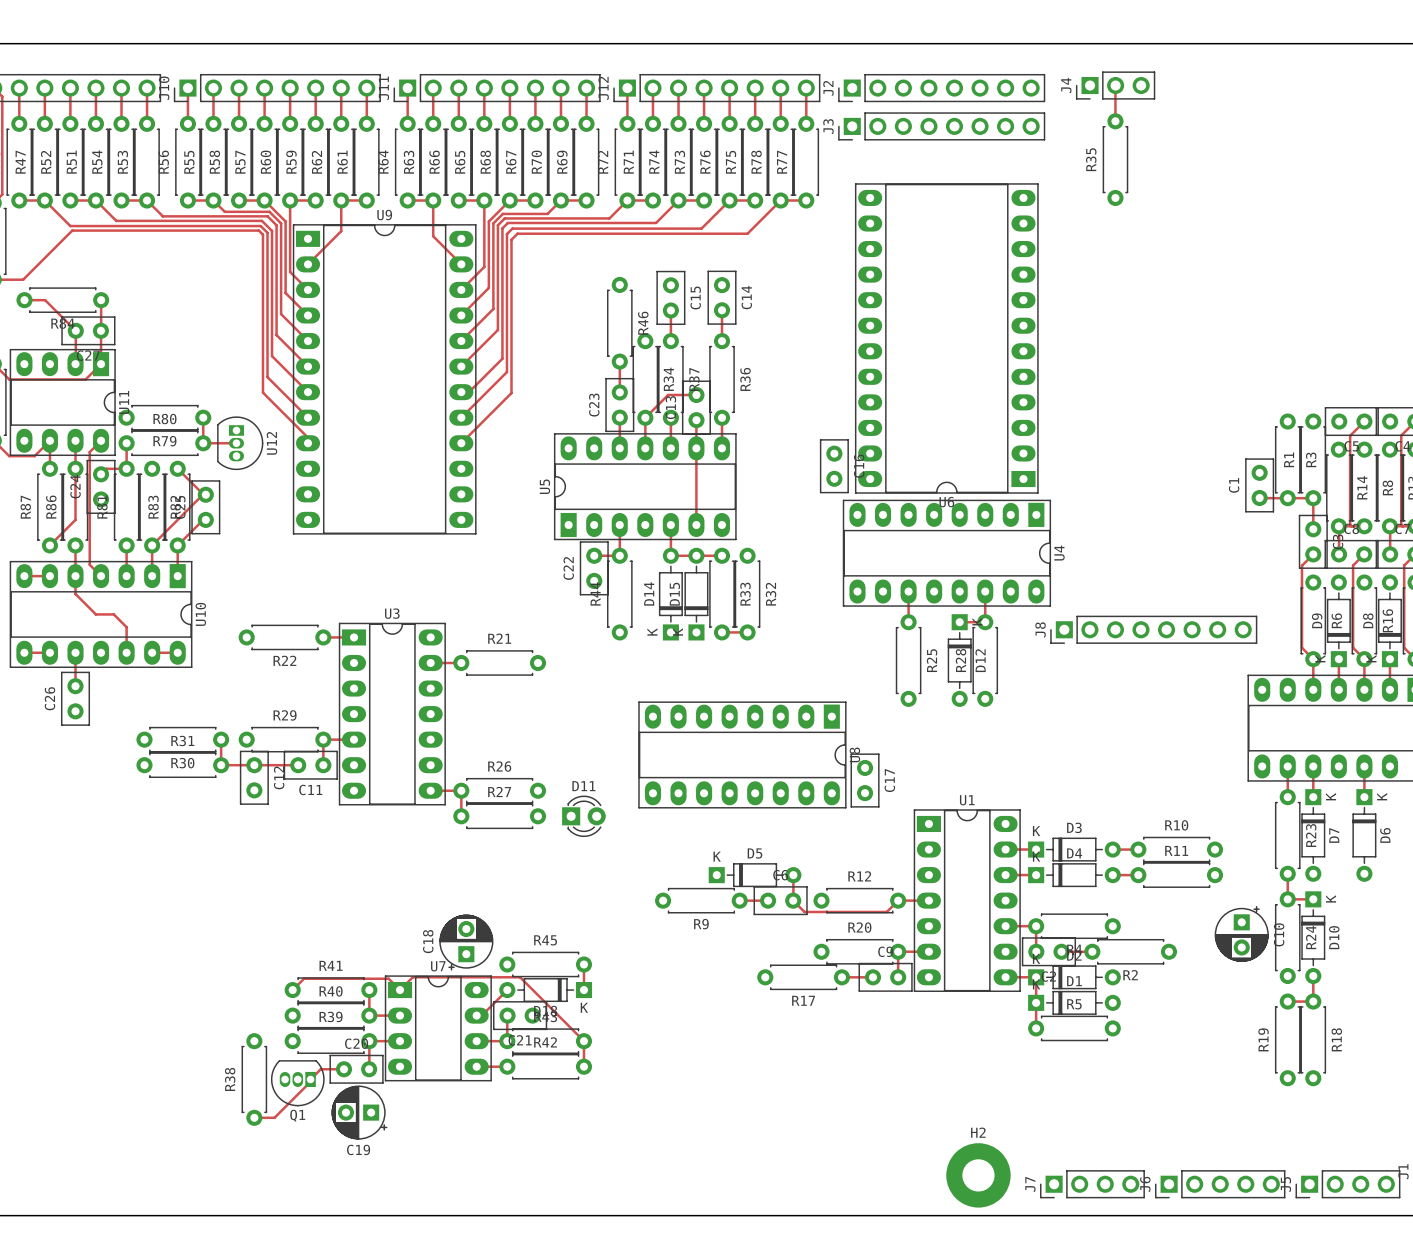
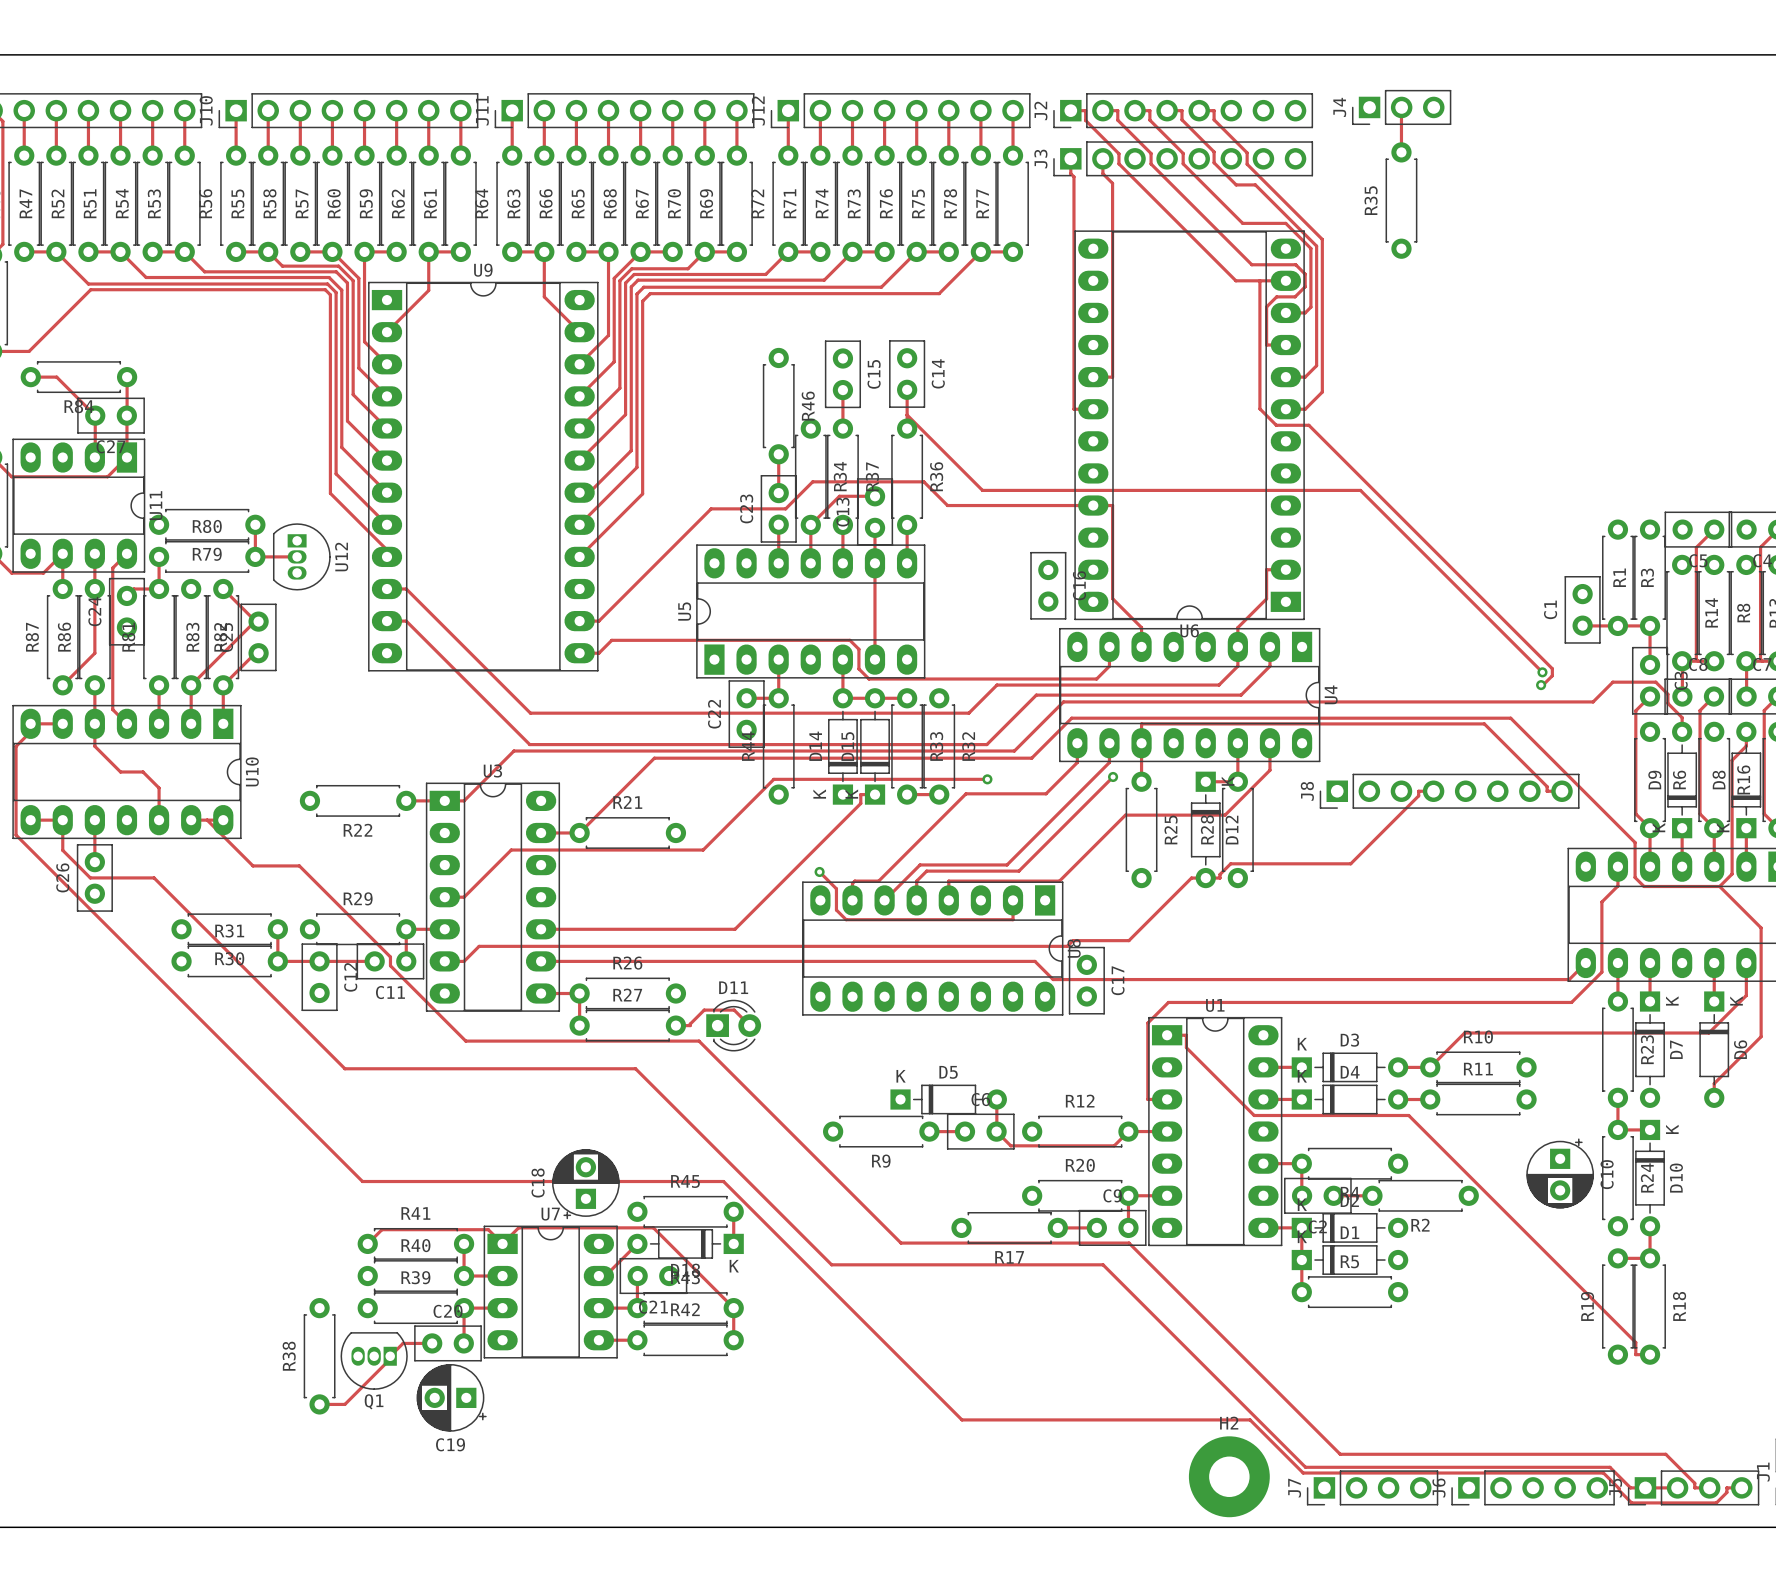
track: none -> (1070, 110) (1085, 110) (1085, 120) (1118, 153) (1118, 163) (1235, 280) (1285, 280)
track: none -> (1102, 110) (1117, 110) (1117, 120) (1151, 153) (1151, 163) (1251, 264) (1295, 264) (1305, 274) (1305, 286) (1295, 296) (1276, 296) (1266, 306) (1266, 345) (1285, 345)
track: none -> (1135, 110) (1149, 110) (1149, 120) (1183, 153) (1183, 163) (1242, 223) (1285, 223) (1310, 248) (1310, 307) (1305, 312) (1285, 312)
track: none -> (1167, 110) (1181, 110) (1181, 119) (1214, 151) (1214, 162) (1236, 184) (1255, 184) (1316, 246) (1316, 365) (1305, 377) (1285, 377)
track: none -> (1199, 110) (1214, 110) (1214, 119) (1247, 152) (1247, 164) (1322, 239) (1322, 392) (1305, 409) (1285, 409)
track: none -> (1070, 158) (1070, 173) (1073, 176) (1073, 409) (1093, 409)
track: none -> (1102, 158) (1102, 173) (1112, 183) (1112, 377) (1093, 377)
track: none -> (1259, 280) (1259, 408) (1276, 425) (1308, 425) (1552, 668) (1552, 675) (1541, 685)
track: none -> (907, 415) (982, 490) (1360, 490) (1542, 672)
track: none -> (1285, 569) (1266, 569) (1266, 598) (1237, 627) (1237, 666) (1219, 685) (996, 685) (968, 713) (530, 713) (406, 589) (387, 589)
track: none -> (387, 621) (406, 621) (529, 744) (986, 744) (1036, 695) (1241, 695) (1269, 666) (1269, 646)
track: none -> (579, 621) (598, 621) (711, 508) (785, 508) (812, 481) (923, 481) (947, 505) (1112, 505) (1112, 598) (1141, 627) (1141, 646)
track: none -> (1109, 646) (1109, 666) (1096, 679) (868, 679) (858, 668) (858, 649) (849, 640) (611, 640) (598, 653) (579, 653)
via: none -> (1542, 672)
via: none -> (1541, 685)
track: none -> (38, 723) (16, 746) (16, 835) (362, 1181) (723, 1181) (961, 1419) (1250, 1419) (1303, 1473) (1603, 1473) (1631, 1502) (1716, 1502) (1726, 1492) (1726, 1487) (1741, 1487)
track: none -> (1682, 731) (1682, 717) (1667, 703) (1667, 694) (1655, 682) (1612, 682) (1593, 701) (1063, 701) (1014, 751) (513, 751) (464, 800) (444, 800)
track: none -> (1746, 731) (1746, 746) (1732, 760) (1732, 874) (1719, 886)
track: none -> (1077, 743) (1077, 762) (1046, 793) (966, 793) (878, 881) (854, 881) (852, 883) (852, 900)
track: none -> (1109, 743) (1109, 762) (1007, 864) (920, 864) (884, 900)
track: none -> (1141, 743) (1141, 723) (1484, 723) (1547, 786) (1547, 791) (1561, 791)
track: none -> (1269, 743) (1269, 770) (1225, 815) (1125, 815) (1059, 881) (948, 881) (948, 900)
track: none -> (1113, 776) (1018, 871) (926, 871) (916, 881) (916, 900)
via: none -> (1113, 776)
track: none -> (987, 779) (773, 779) (703, 850) (511, 850) (464, 897) (444, 897)
via: none -> (987, 779)
track: none -> (1433, 791) (1418, 791) (1418, 795) (1350, 863) (1230, 863) (1220, 874) (1220, 878) (1191, 878) (1128, 940) (1073, 940) (1067, 946) (479, 946) (464, 961) (444, 961)
track: none -> (875, 794) (860, 794) (860, 803) (734, 929) (541, 929)
track: none -> (62, 820) (62, 850) (90, 877) (154, 877) (344, 1068) (635, 1068) (831, 1264) (1103, 1264) (1305, 1467) (1609, 1467) (1630, 1487) (1677, 1487)
track: none -> (207, 820) (253, 865) (299, 865) (390, 957) (390, 965) (465, 1041) (699, 1041) (901, 1243) (1129, 1243) (1340, 1454) (1665, 1454) (1694, 1483) (1694, 1487) (1709, 1487)
track: none -> (579, 832) (654, 758) (1031, 758) (1071, 718) (1510, 718) (1635, 842) (1635, 877) (1644, 886) (1719, 886)
track: none -> (1617, 866) (1617, 885) (1601, 902) (1601, 972) (1571, 1002) (1168, 1002) (1147, 1023) (1147, 1099) (1167, 1099)
track: none -> (819, 871) (836, 888) (836, 910) (846, 919) (1013, 919) (1013, 900)
via: none -> (819, 871)
track: none -> (1719, 886) (1761, 927) (1761, 1036) (1714, 1083) (1714, 1097)
track: none -> (541, 961) (1035, 961) (1053, 979) (1569, 979) (1585, 963)
track: none -> (1746, 963) (1746, 995) (1708, 1033) (1464, 1033) (1430, 1067)
track: none -> (675, 1025) (690, 1025) (704, 1010) (734, 1010) (749, 1025)
track: none -> (1167, 1035) (1186, 1035) (1186, 1047) (1254, 1115) (1408, 1115) (1635, 1342) (1635, 1354) (1650, 1354)

